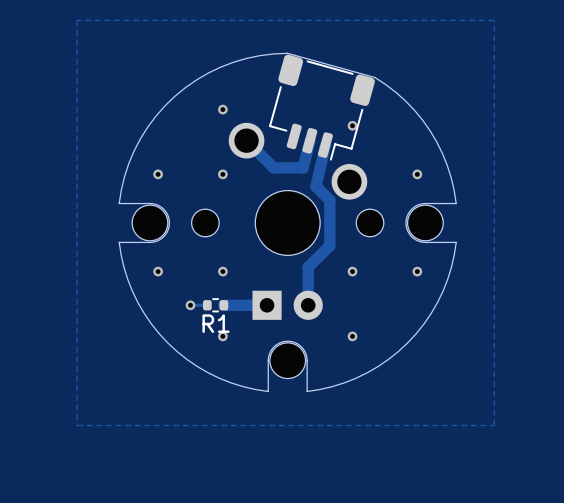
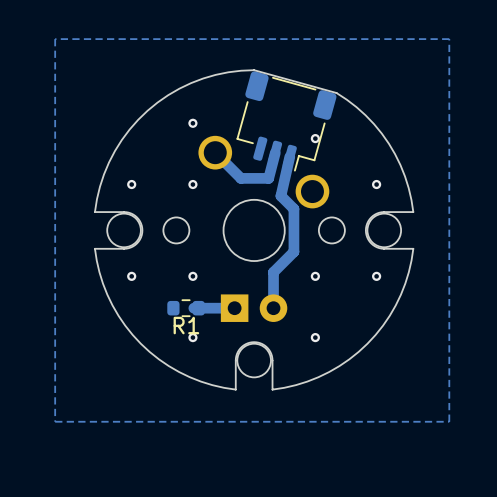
R1 footprint: [202, 298, 229, 313] -> [167, 299, 205, 318]
via: (190, 305) -> none
track: (207, 305) (190, 305) -> none

